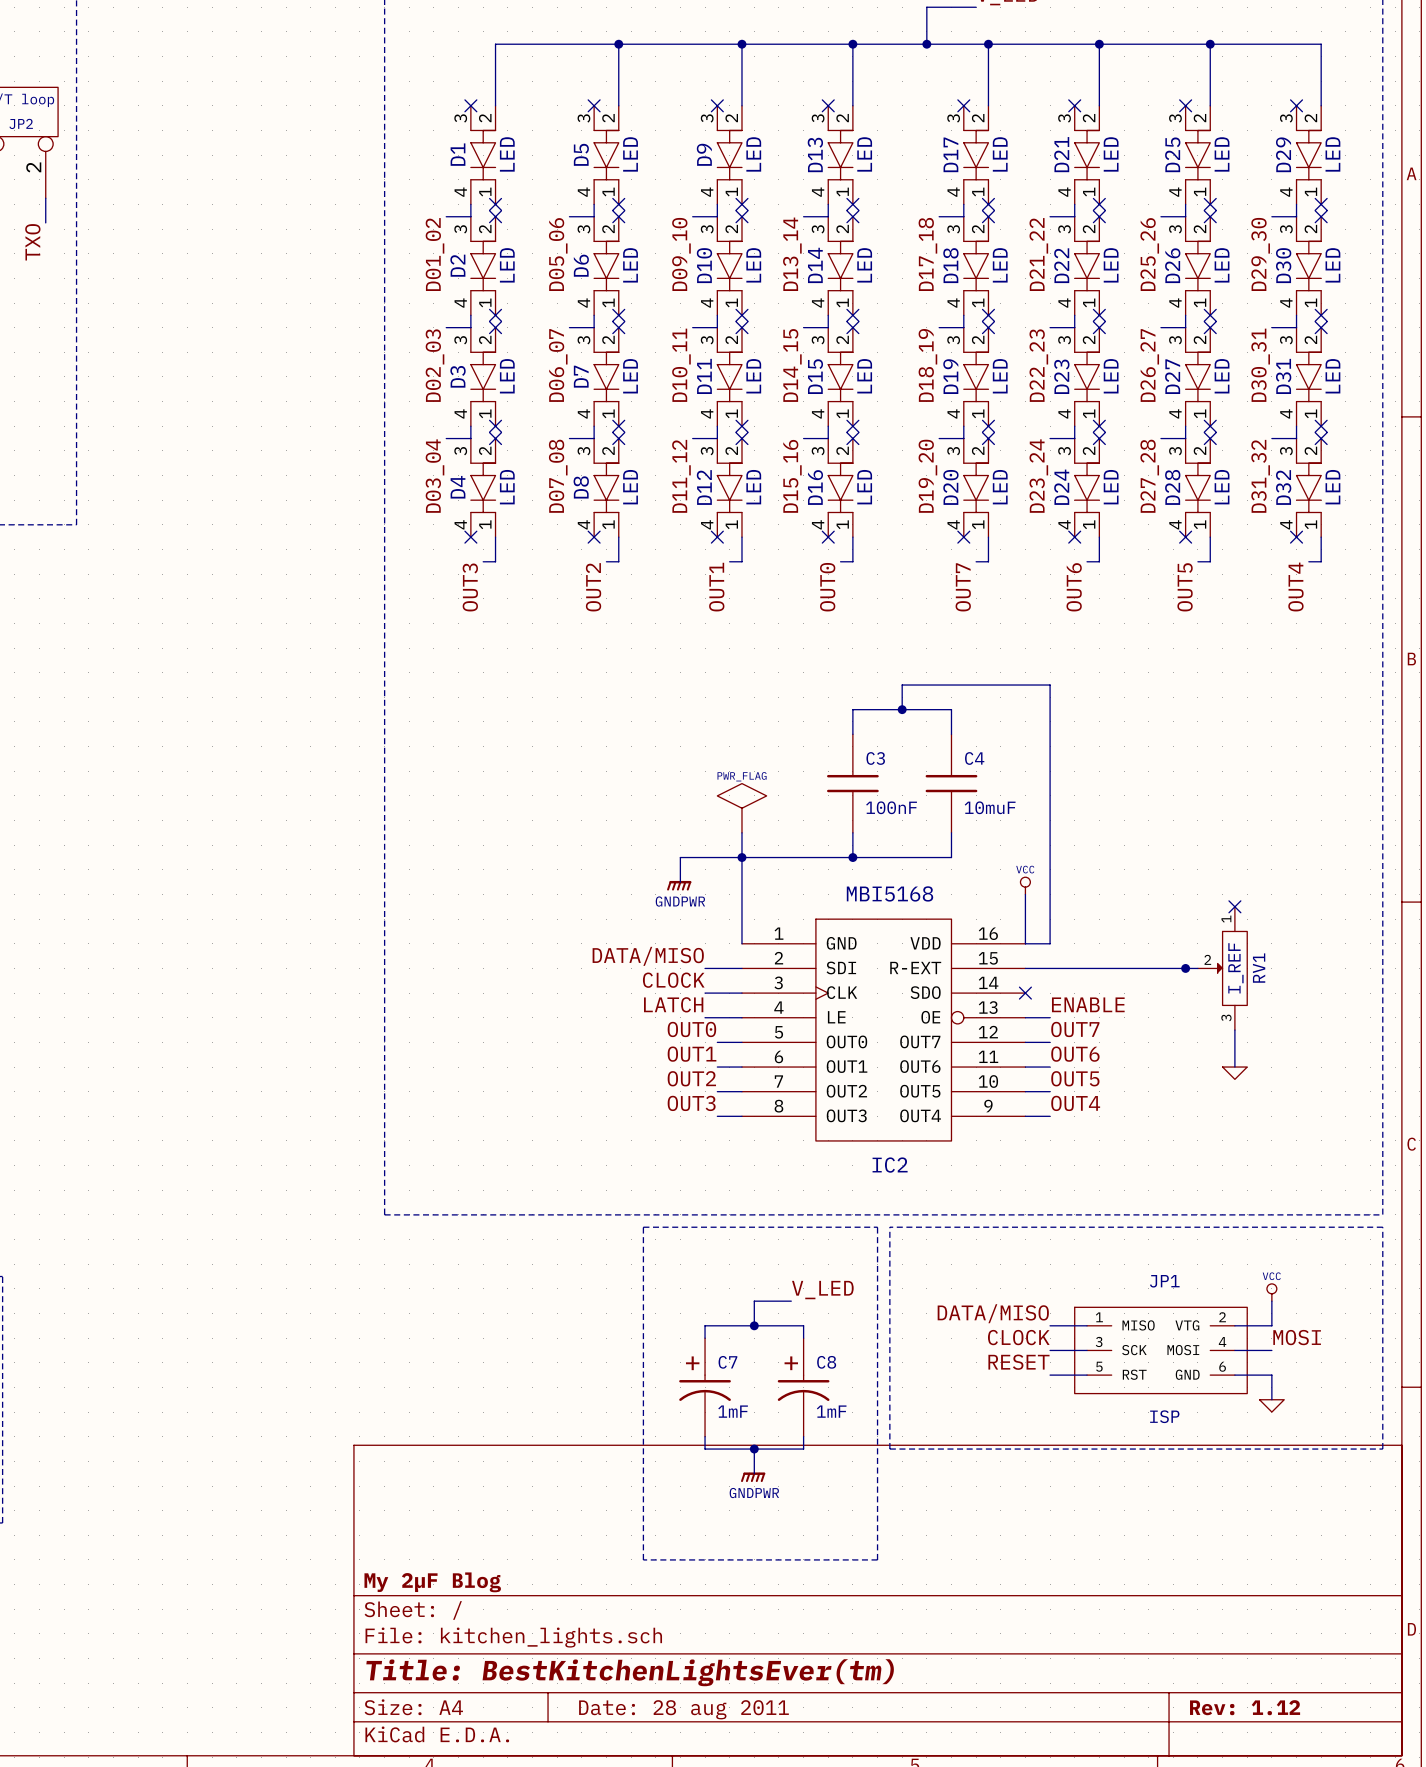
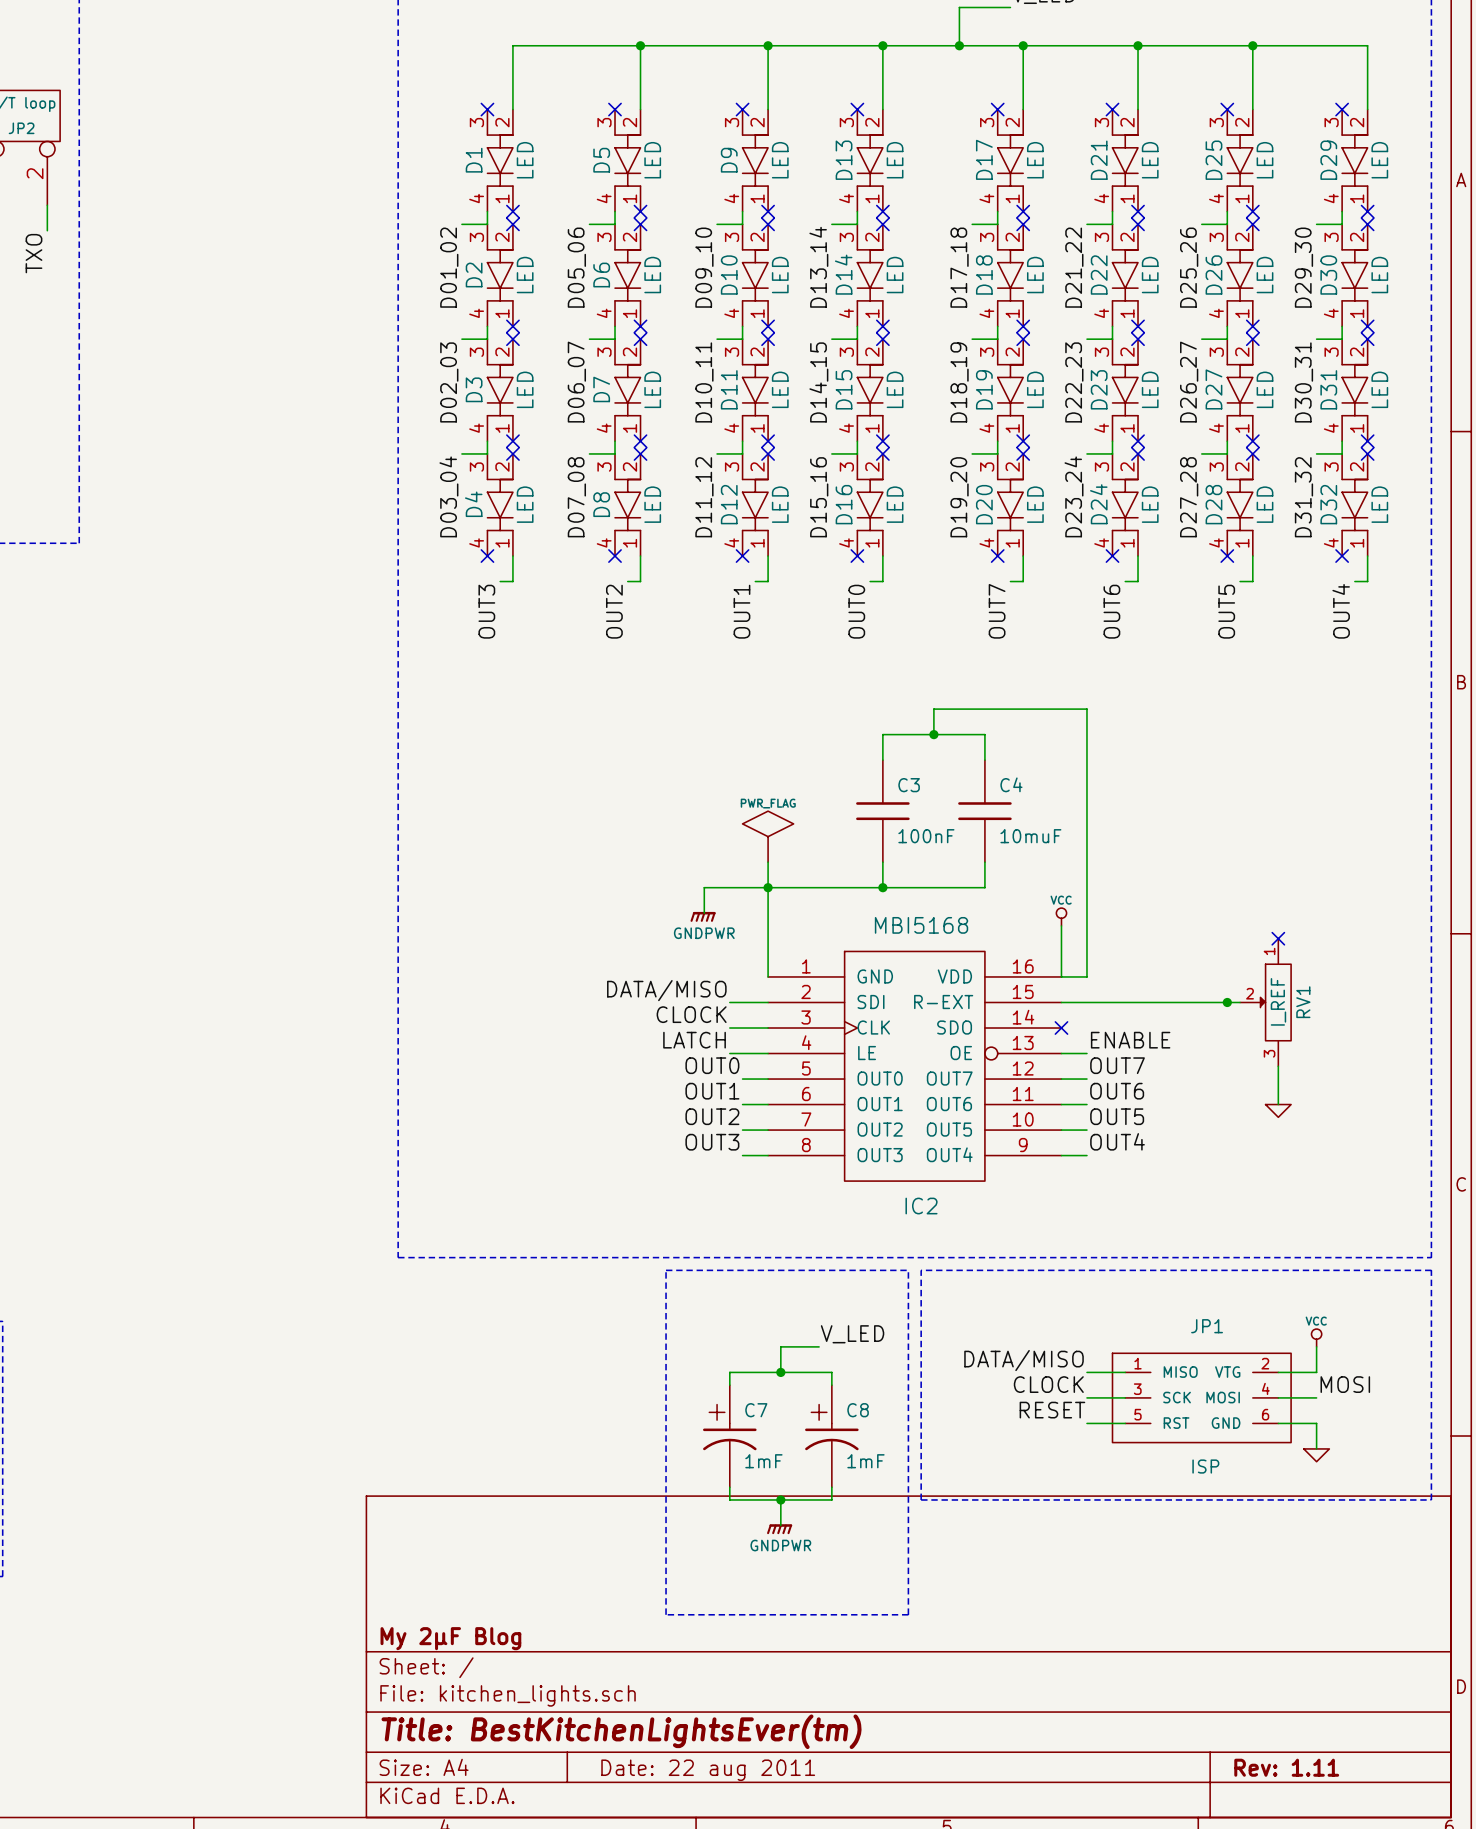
title block: Rev: 1.12 (1245, 1707) -> Rev: 1.11 (1286, 1767)
title block: Date: 28 aug 2011 (683, 1709) -> Date: 22 aug 2011 (708, 1770)

